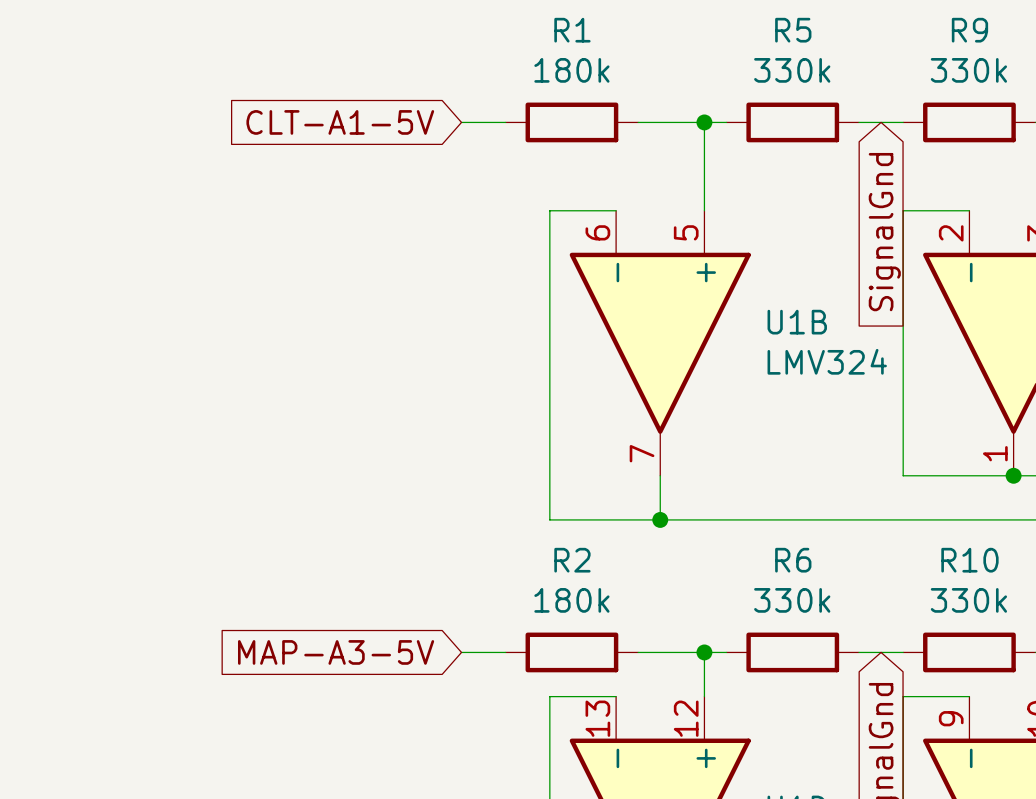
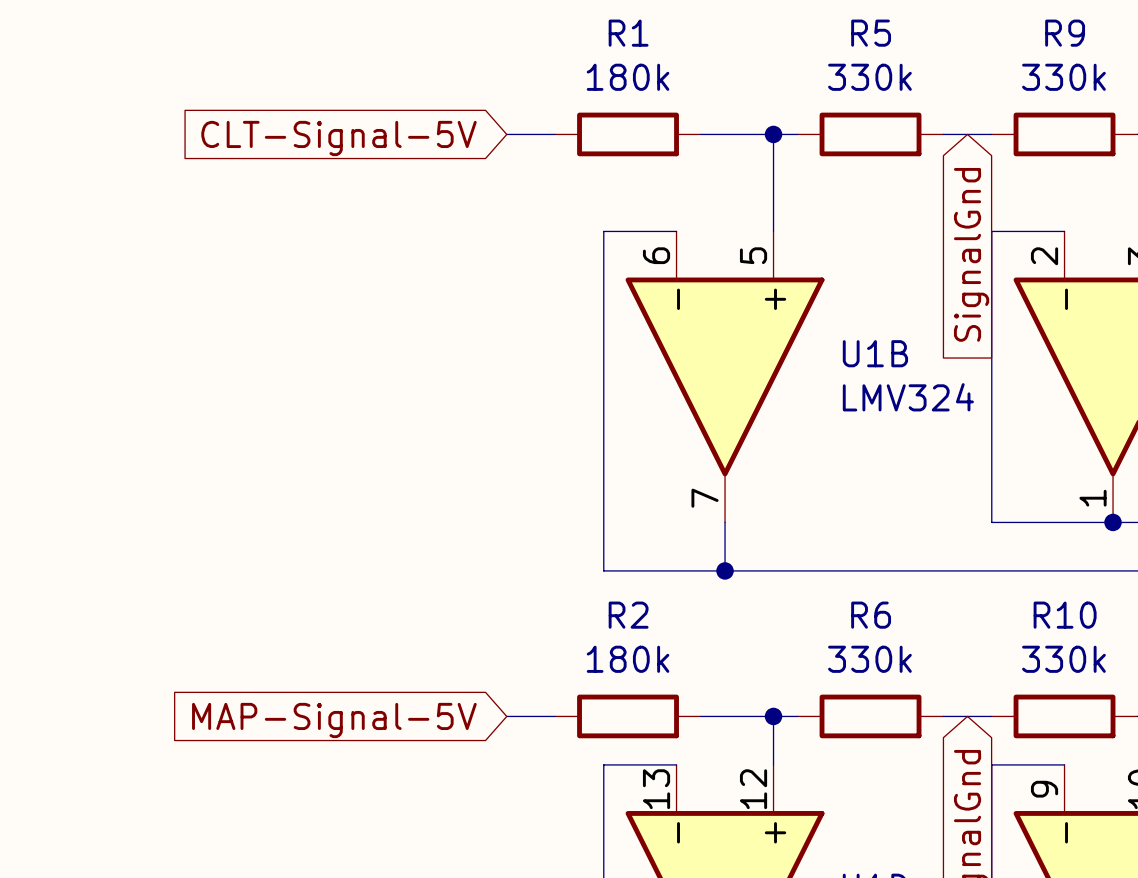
global label: CLT-A1-5V (340, 122) -> CLT-Signal-5V (339, 138)
global label: MAP-A3-5V (336, 652) -> MAP-Signal-5V (334, 720)

